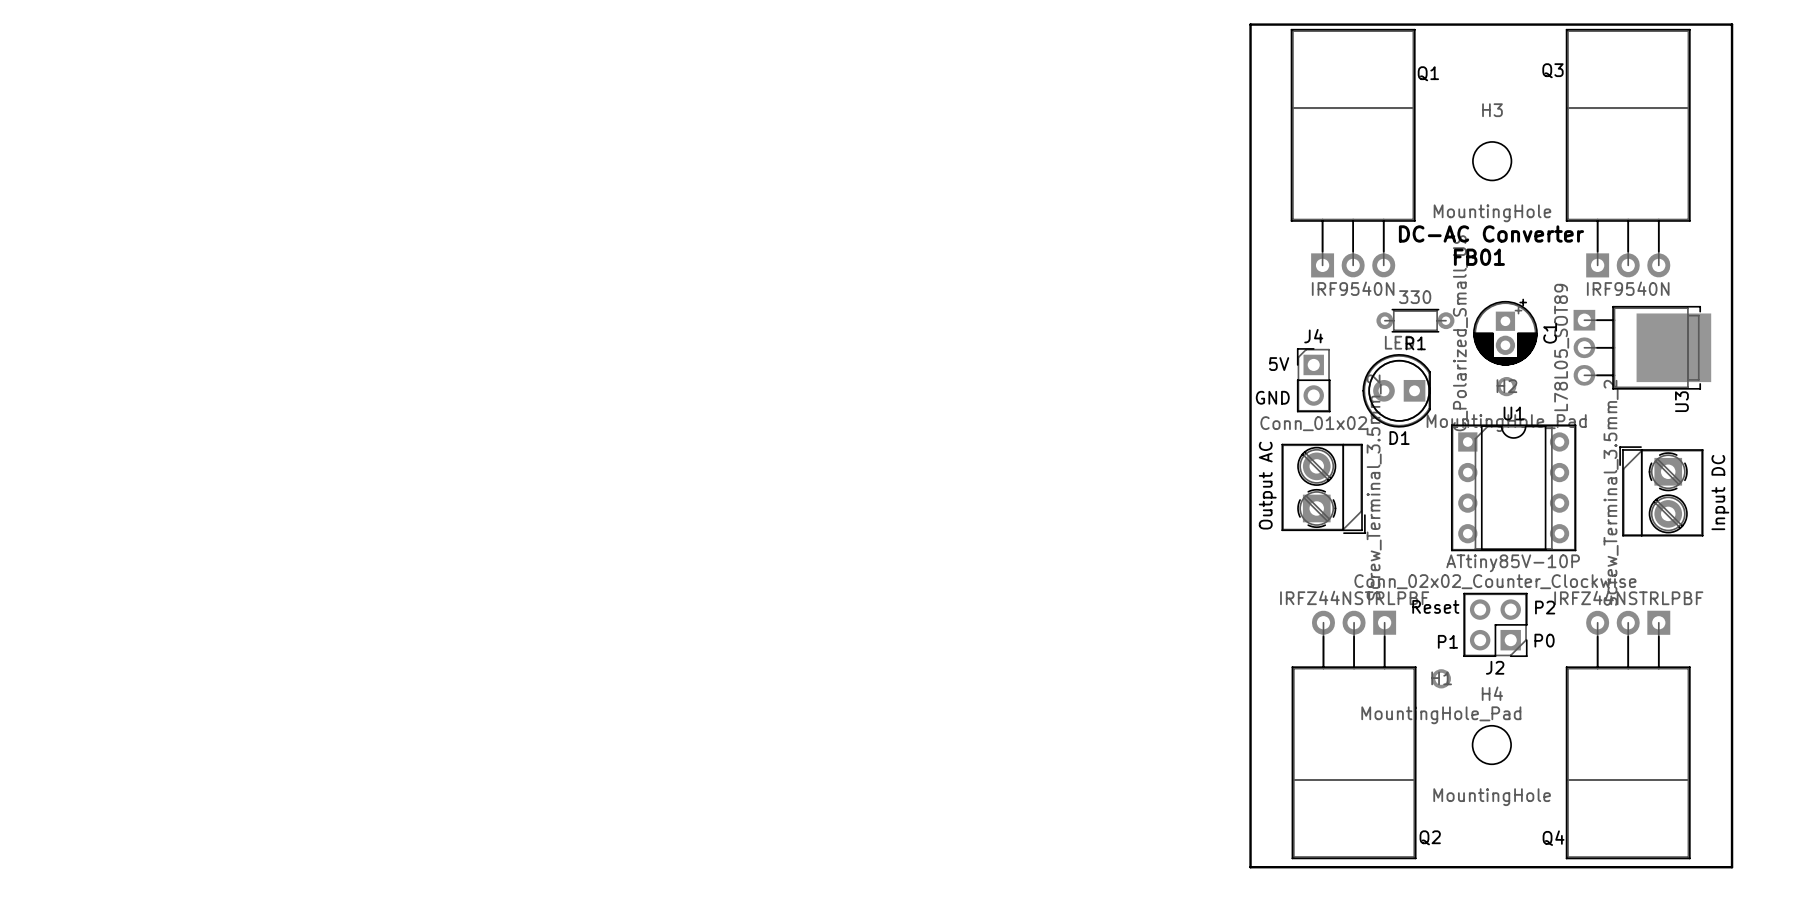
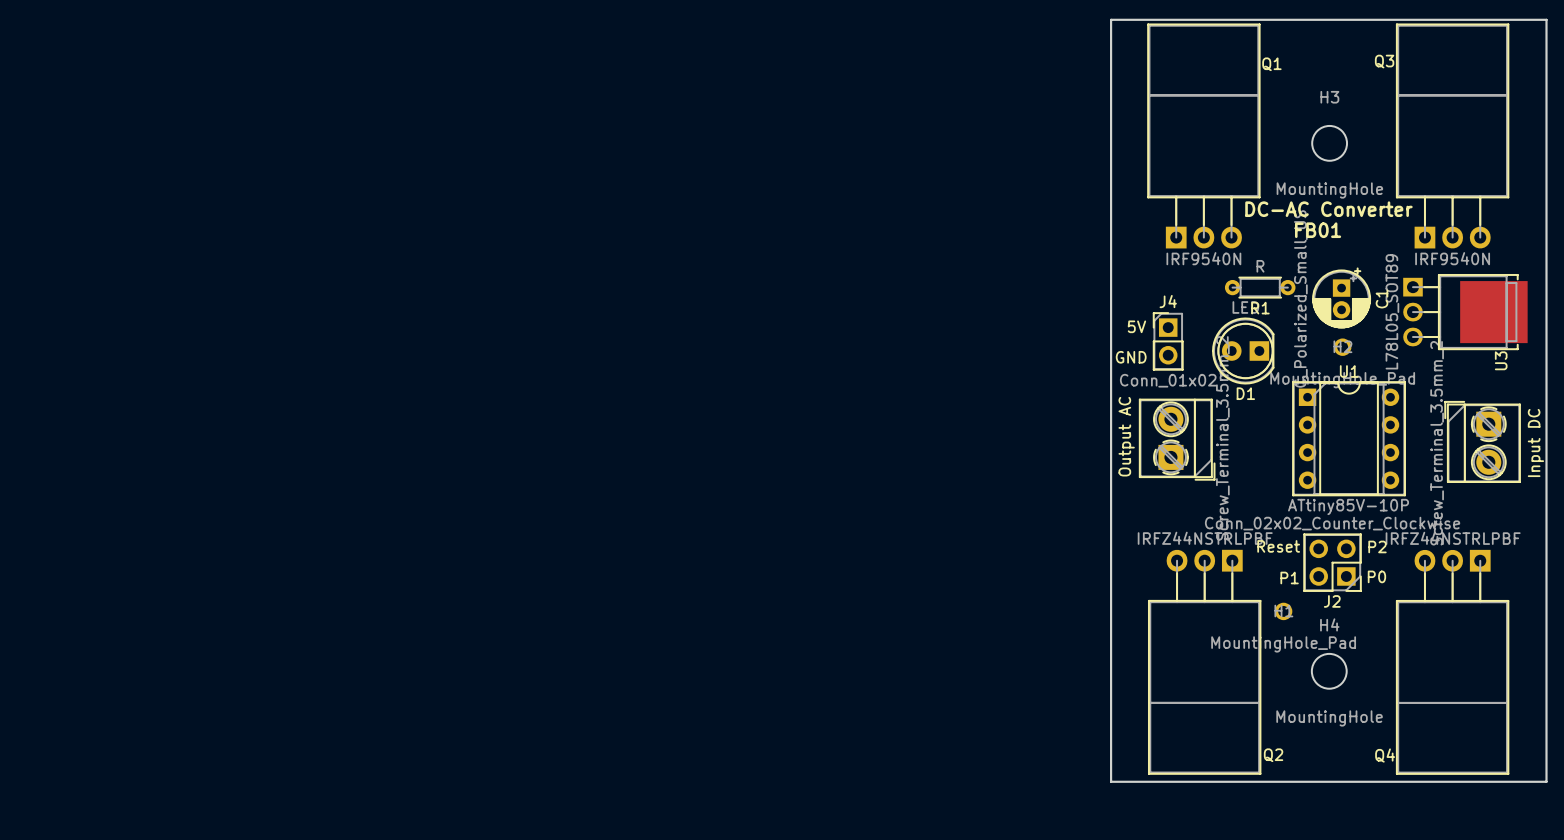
R1 value: 330 (1415, 297) -> R (1260, 266)

